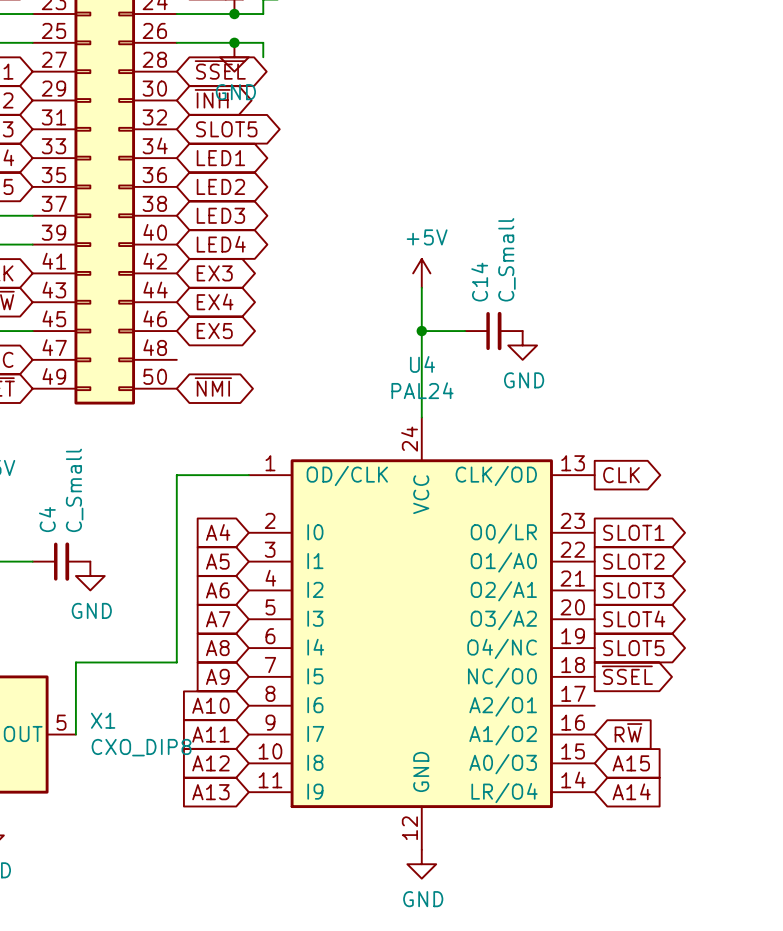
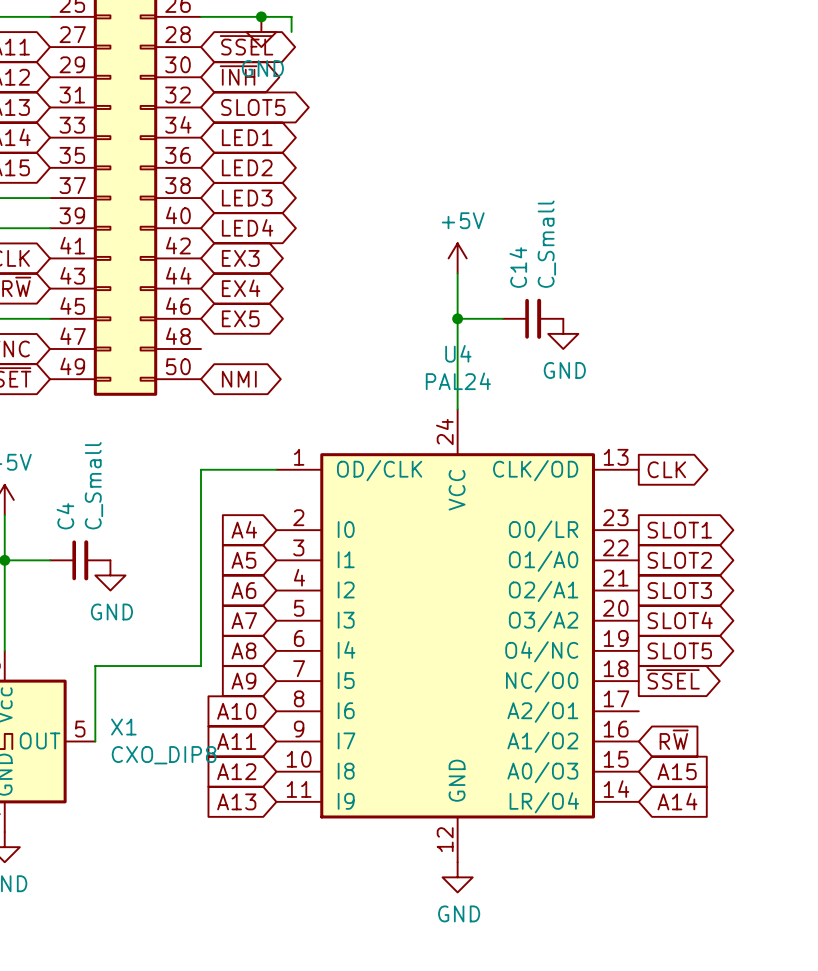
global label: ~{NMI} (213, 387) -> NMI (239, 379)

